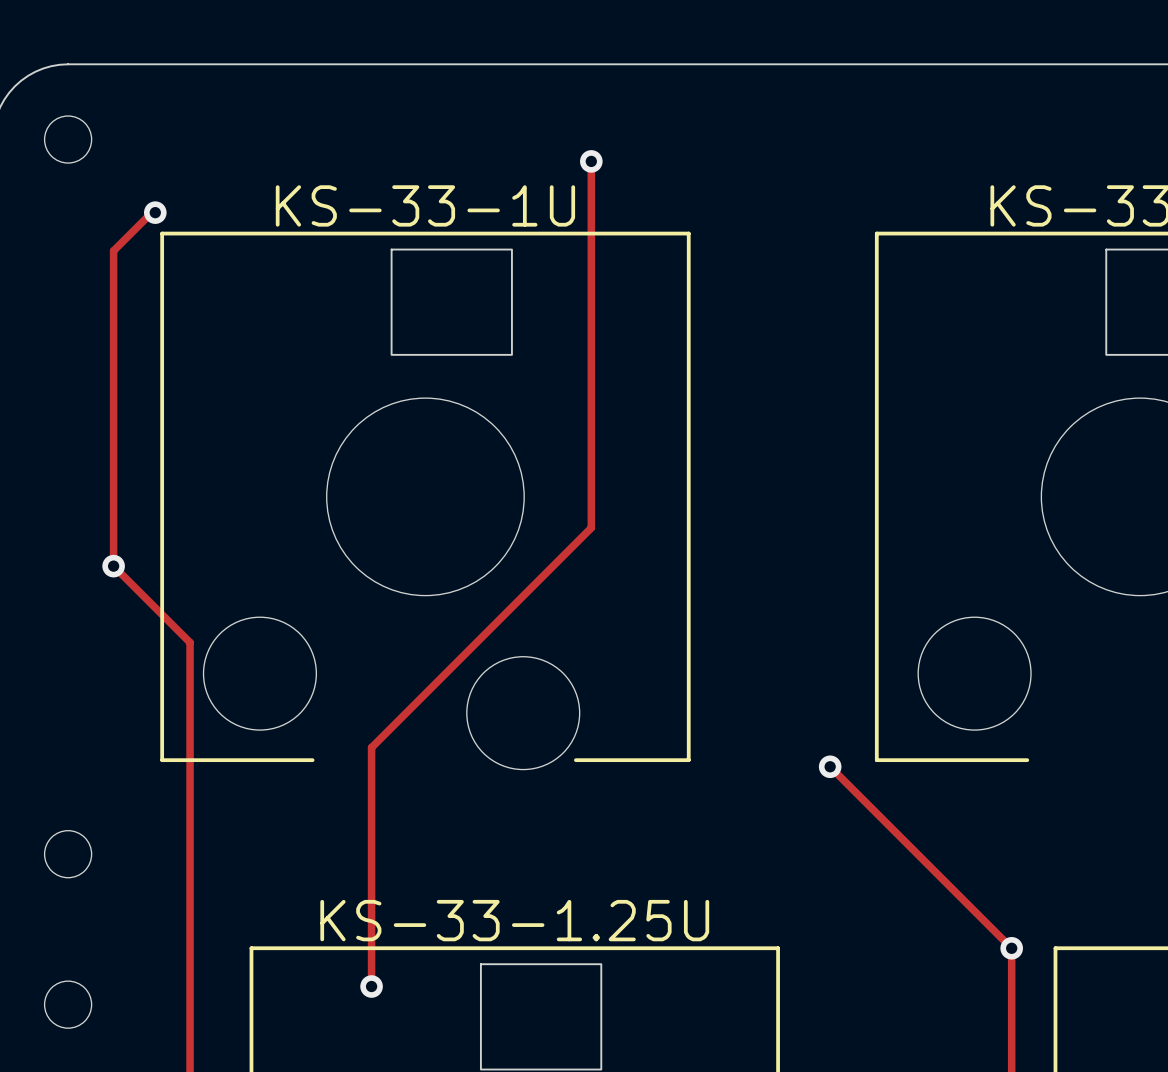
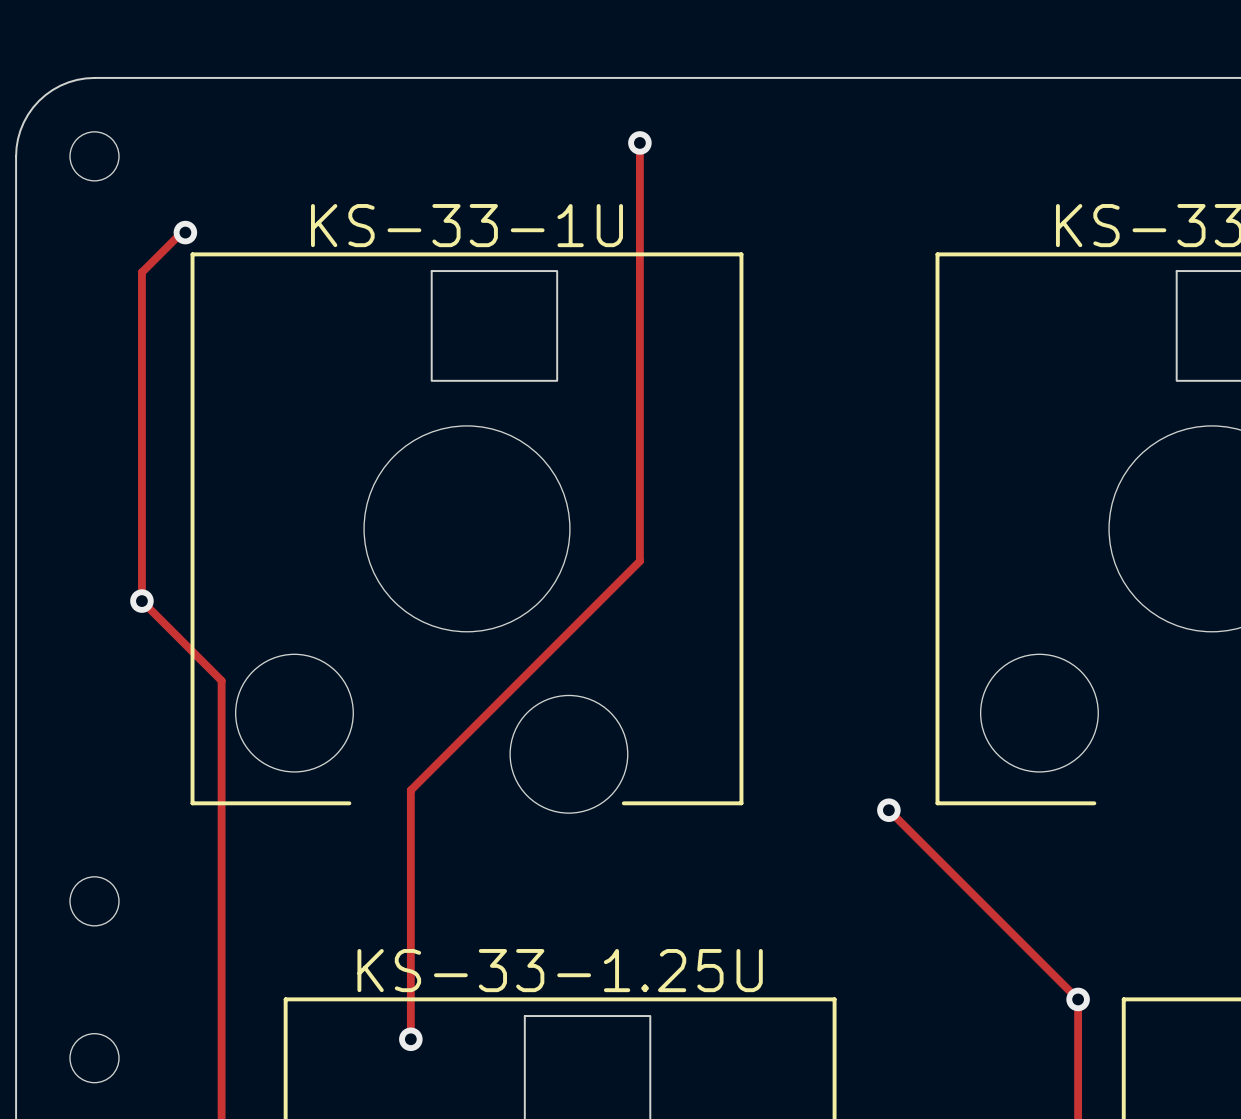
track: none -> (639, 142) (639, 179)
via position: (591, 161) -> (639, 142)

